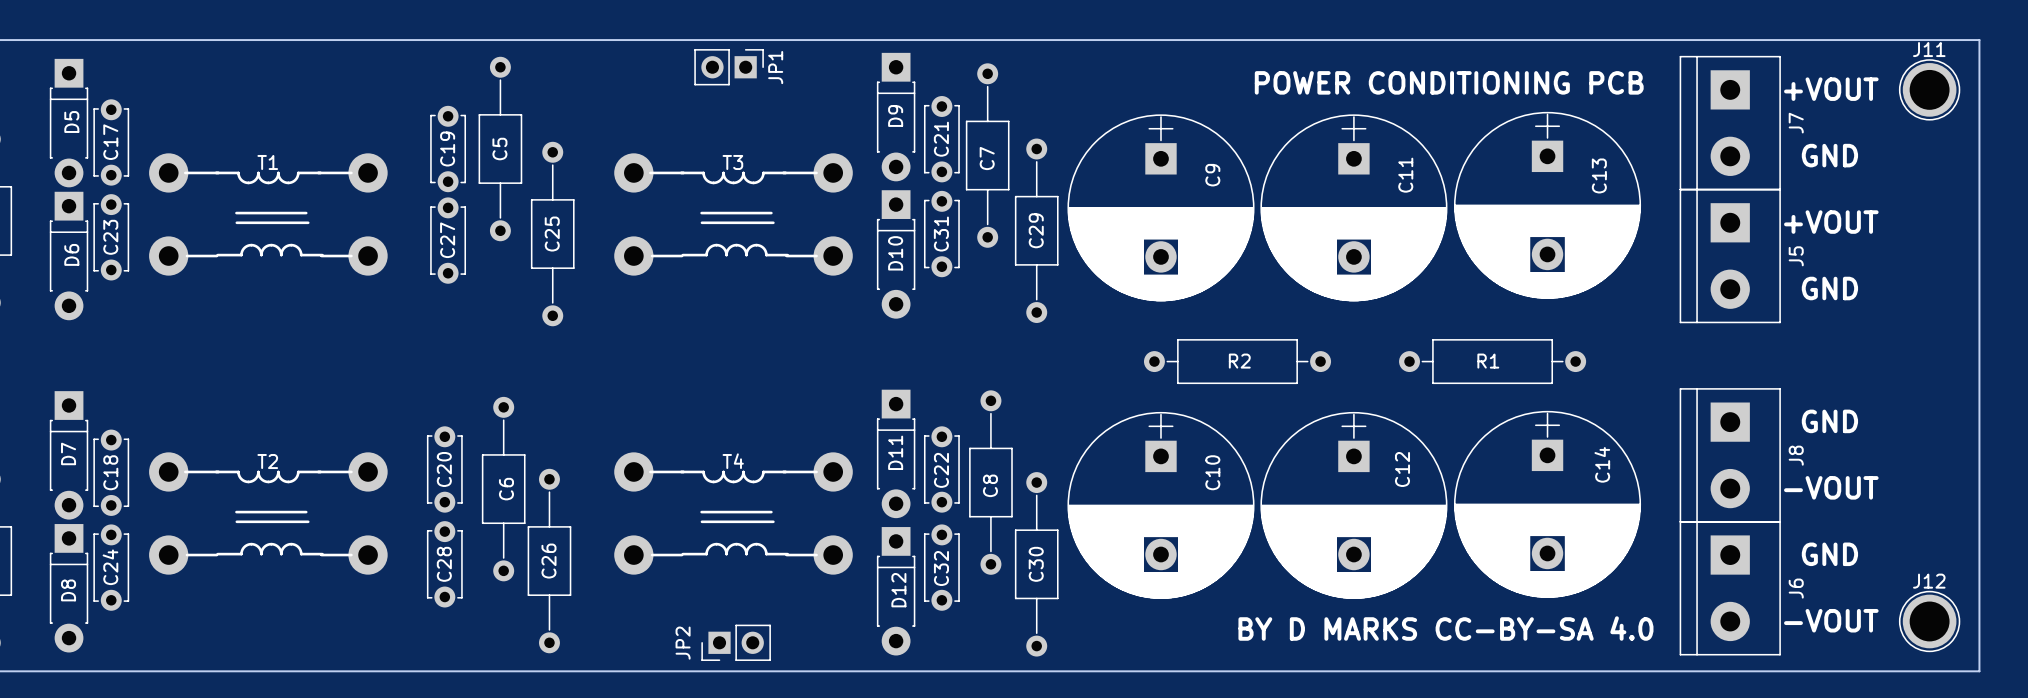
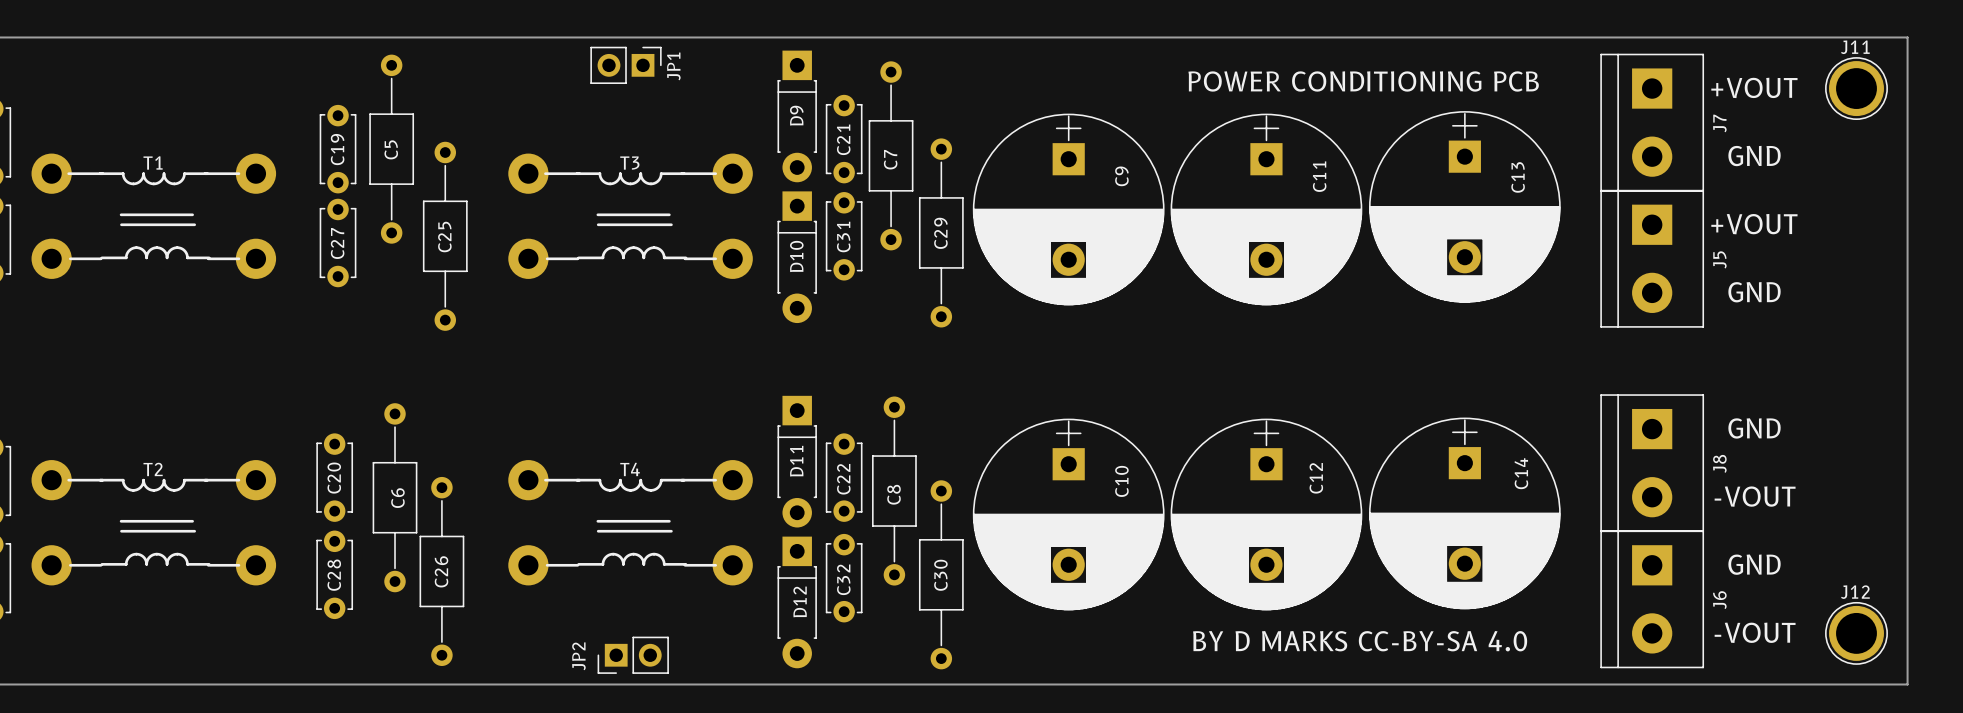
R2: (1237, 361) -> none
R1: (1492, 361) -> none

